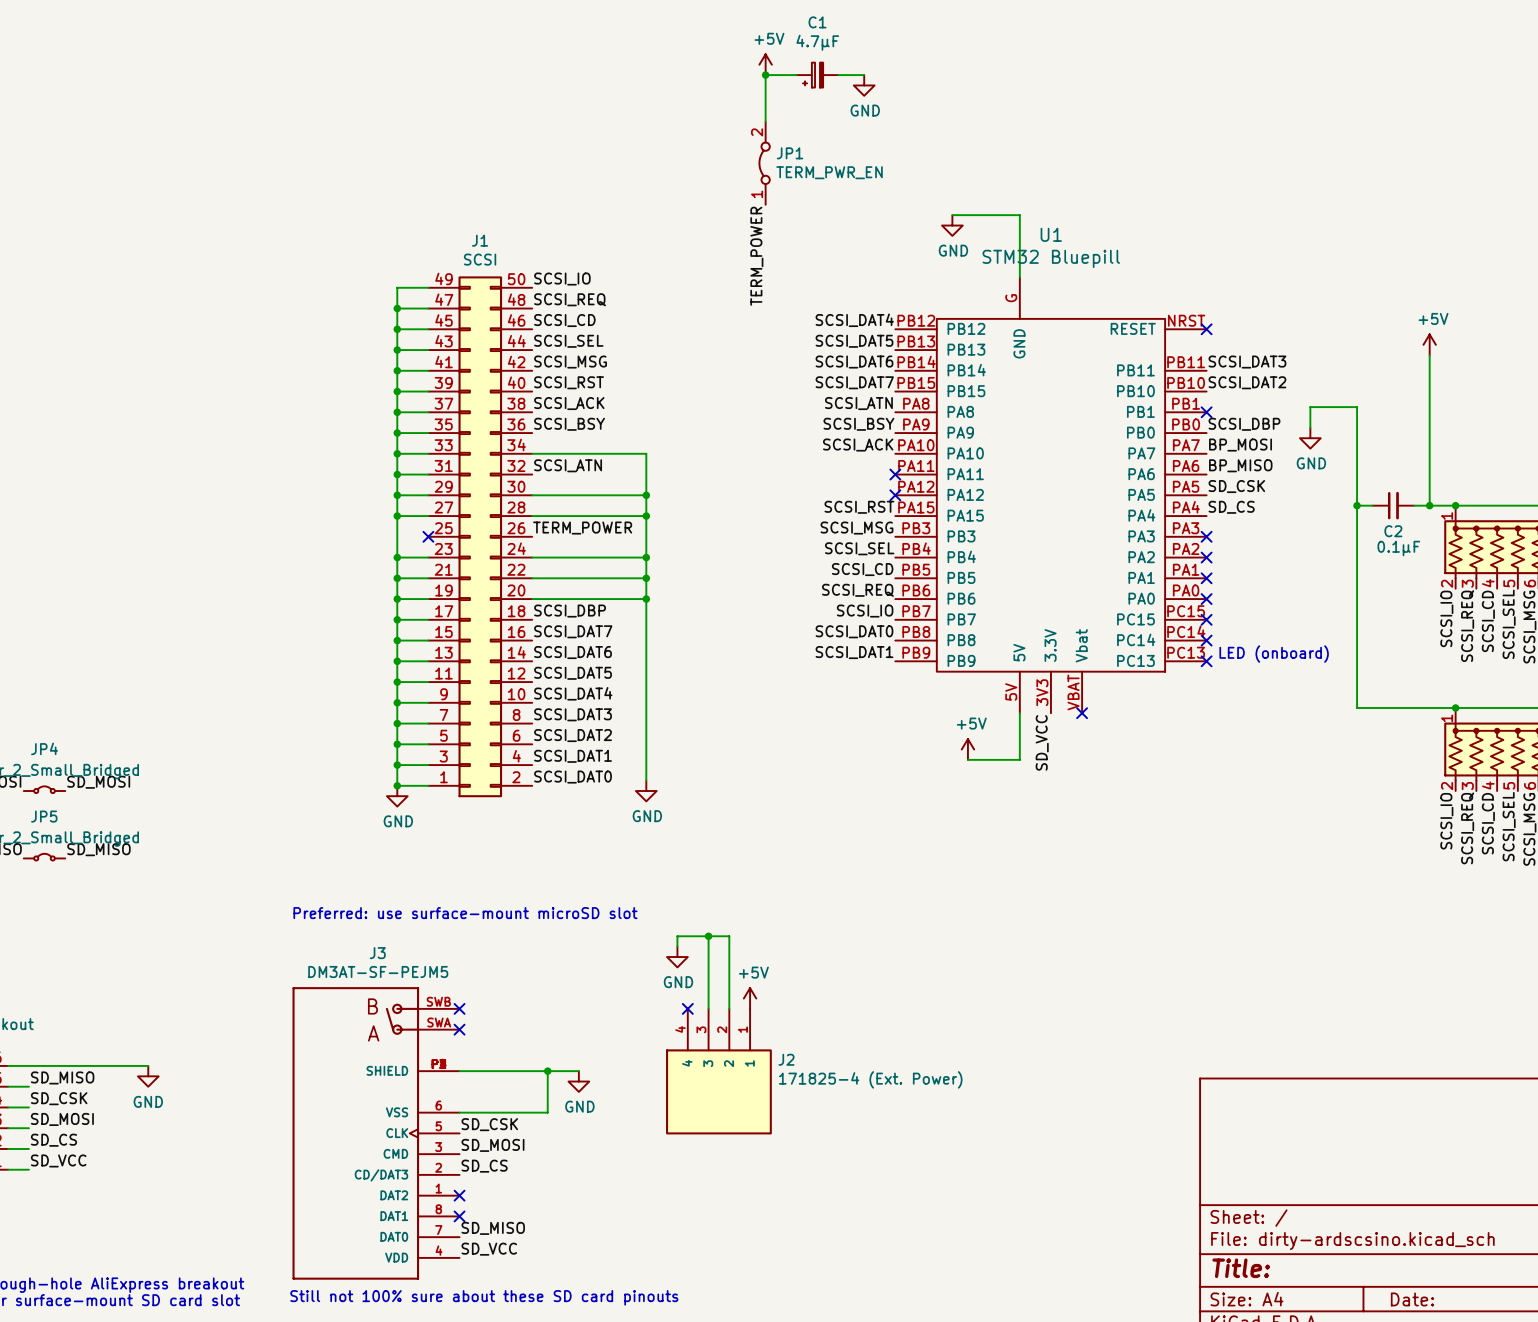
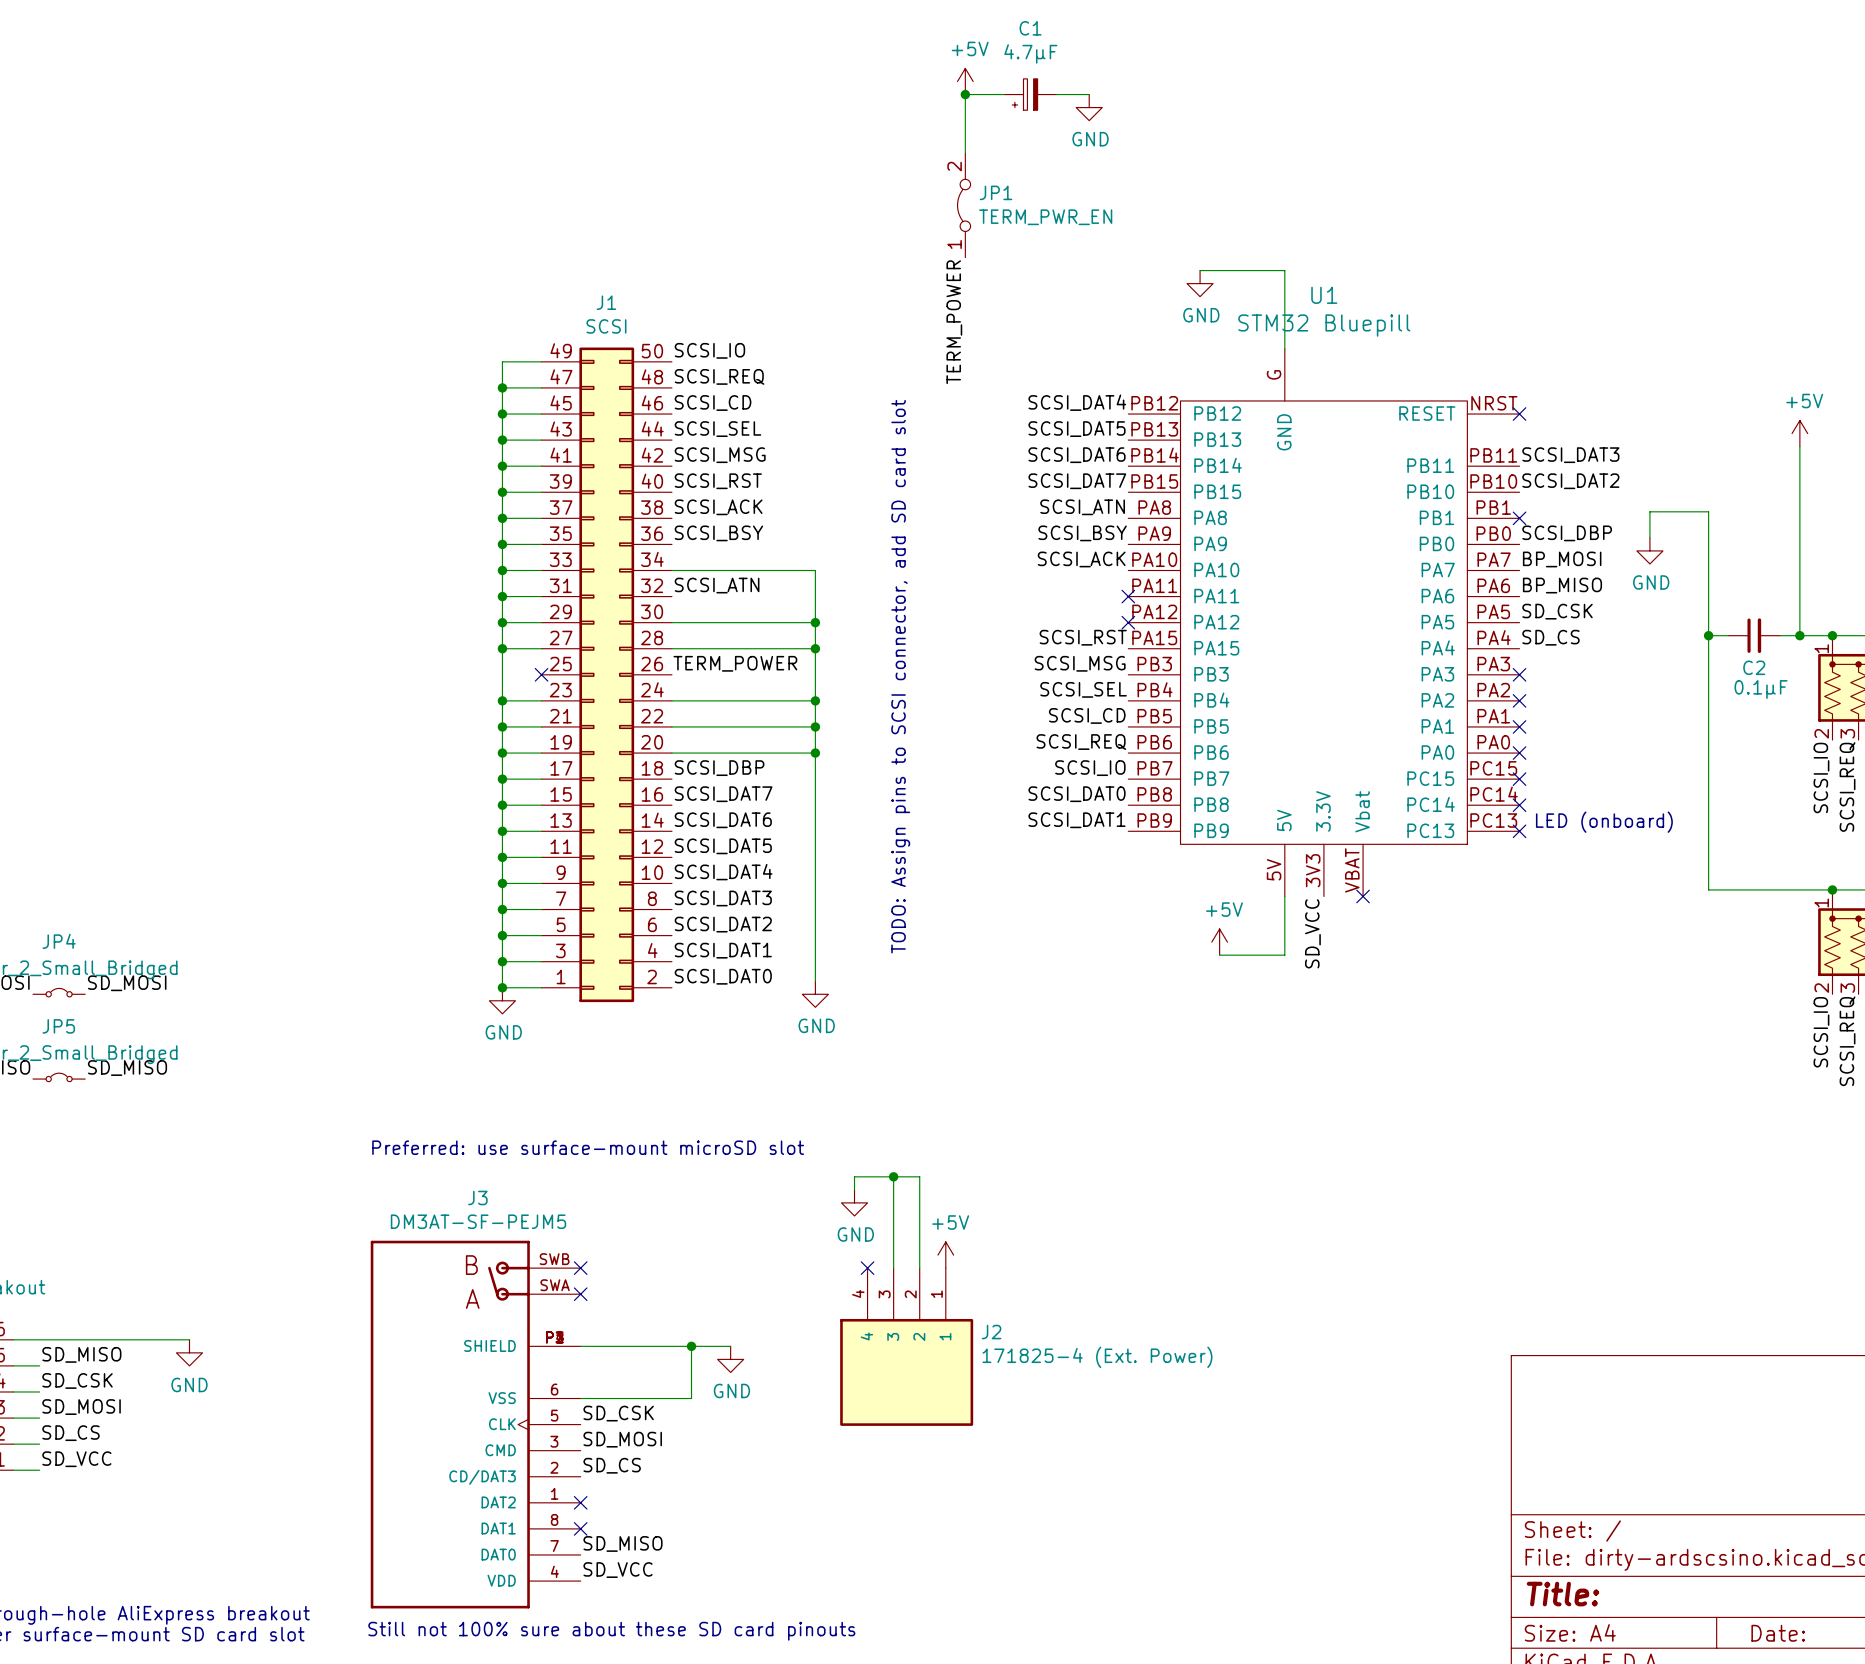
text: none -> TODO: Assign pins to SCSI connector, add SD card slot (900, 676)

